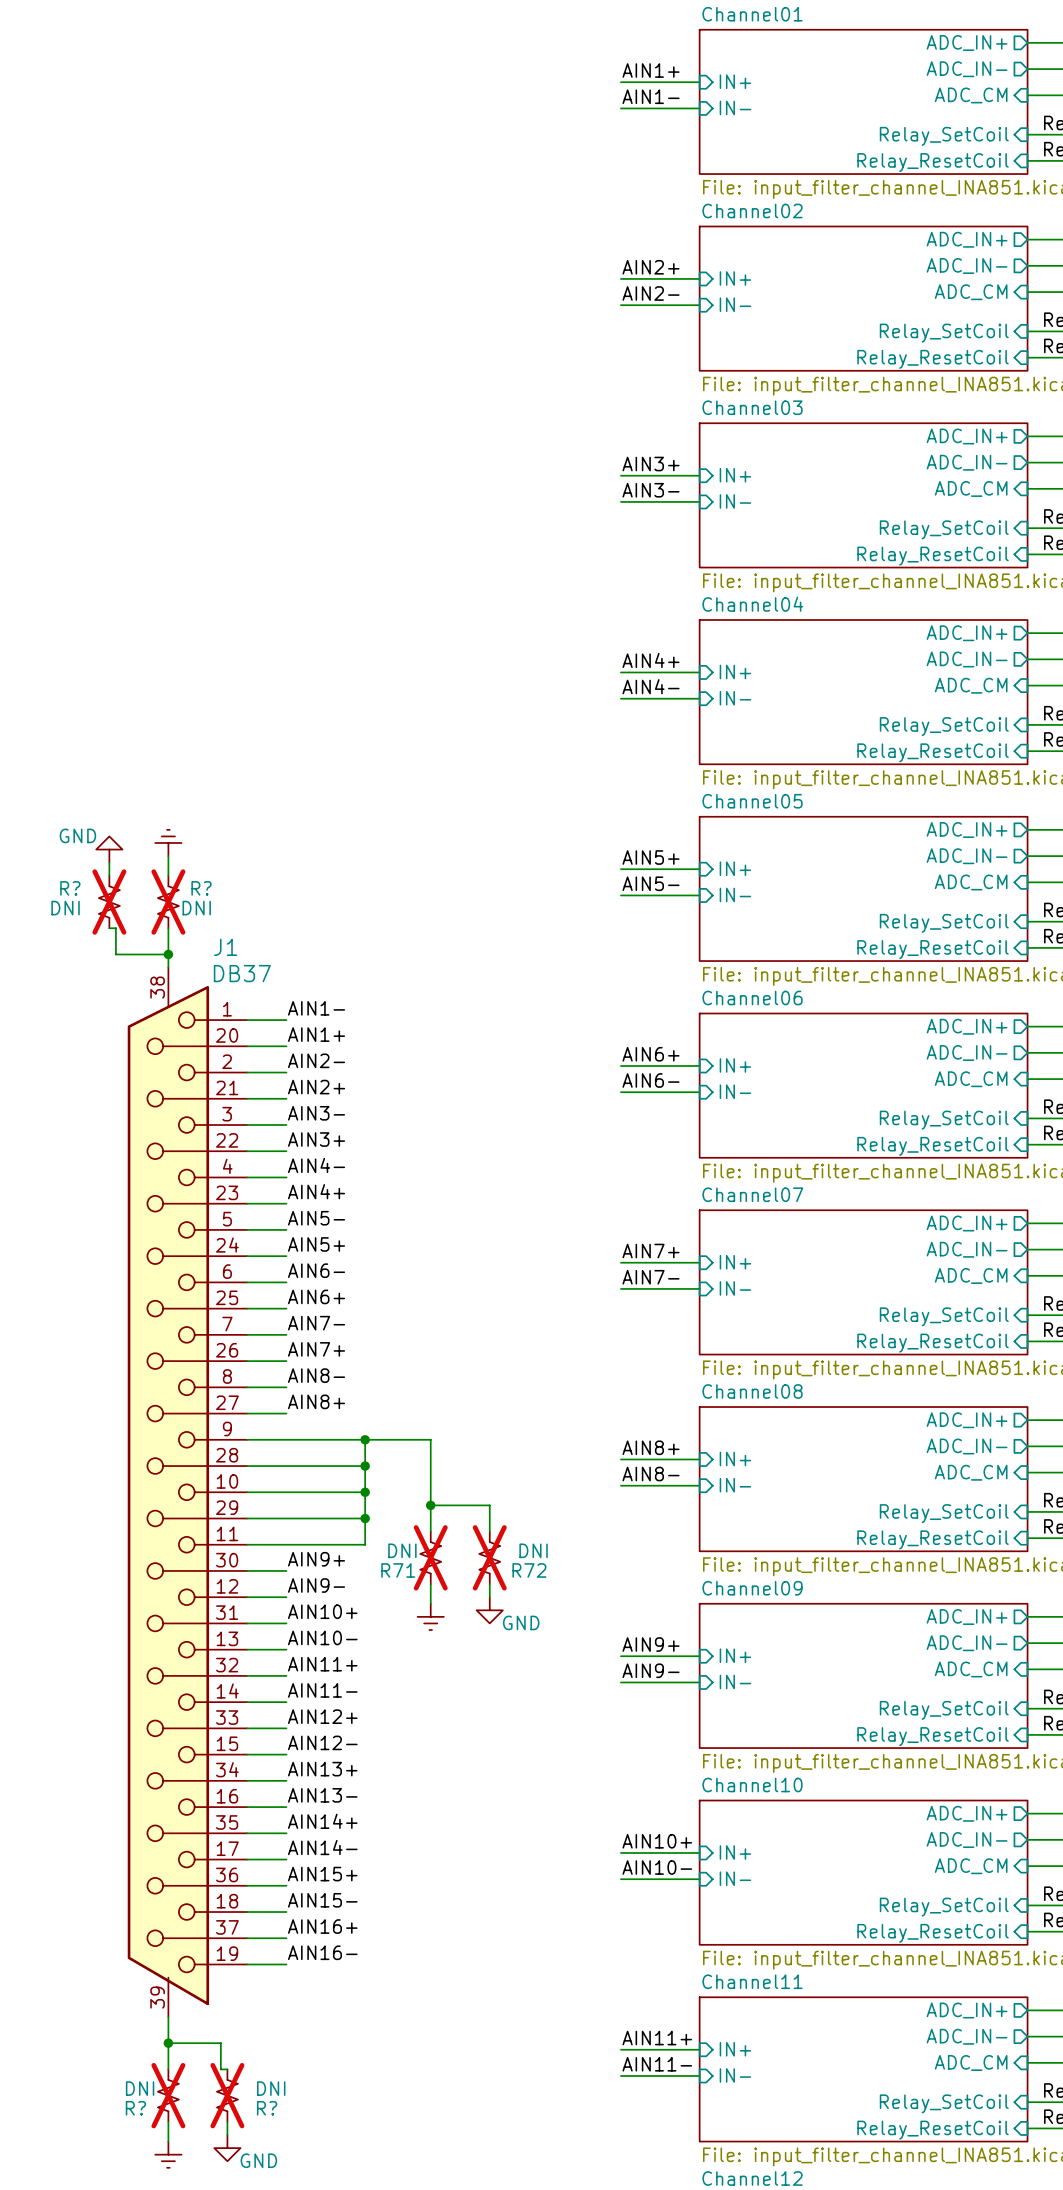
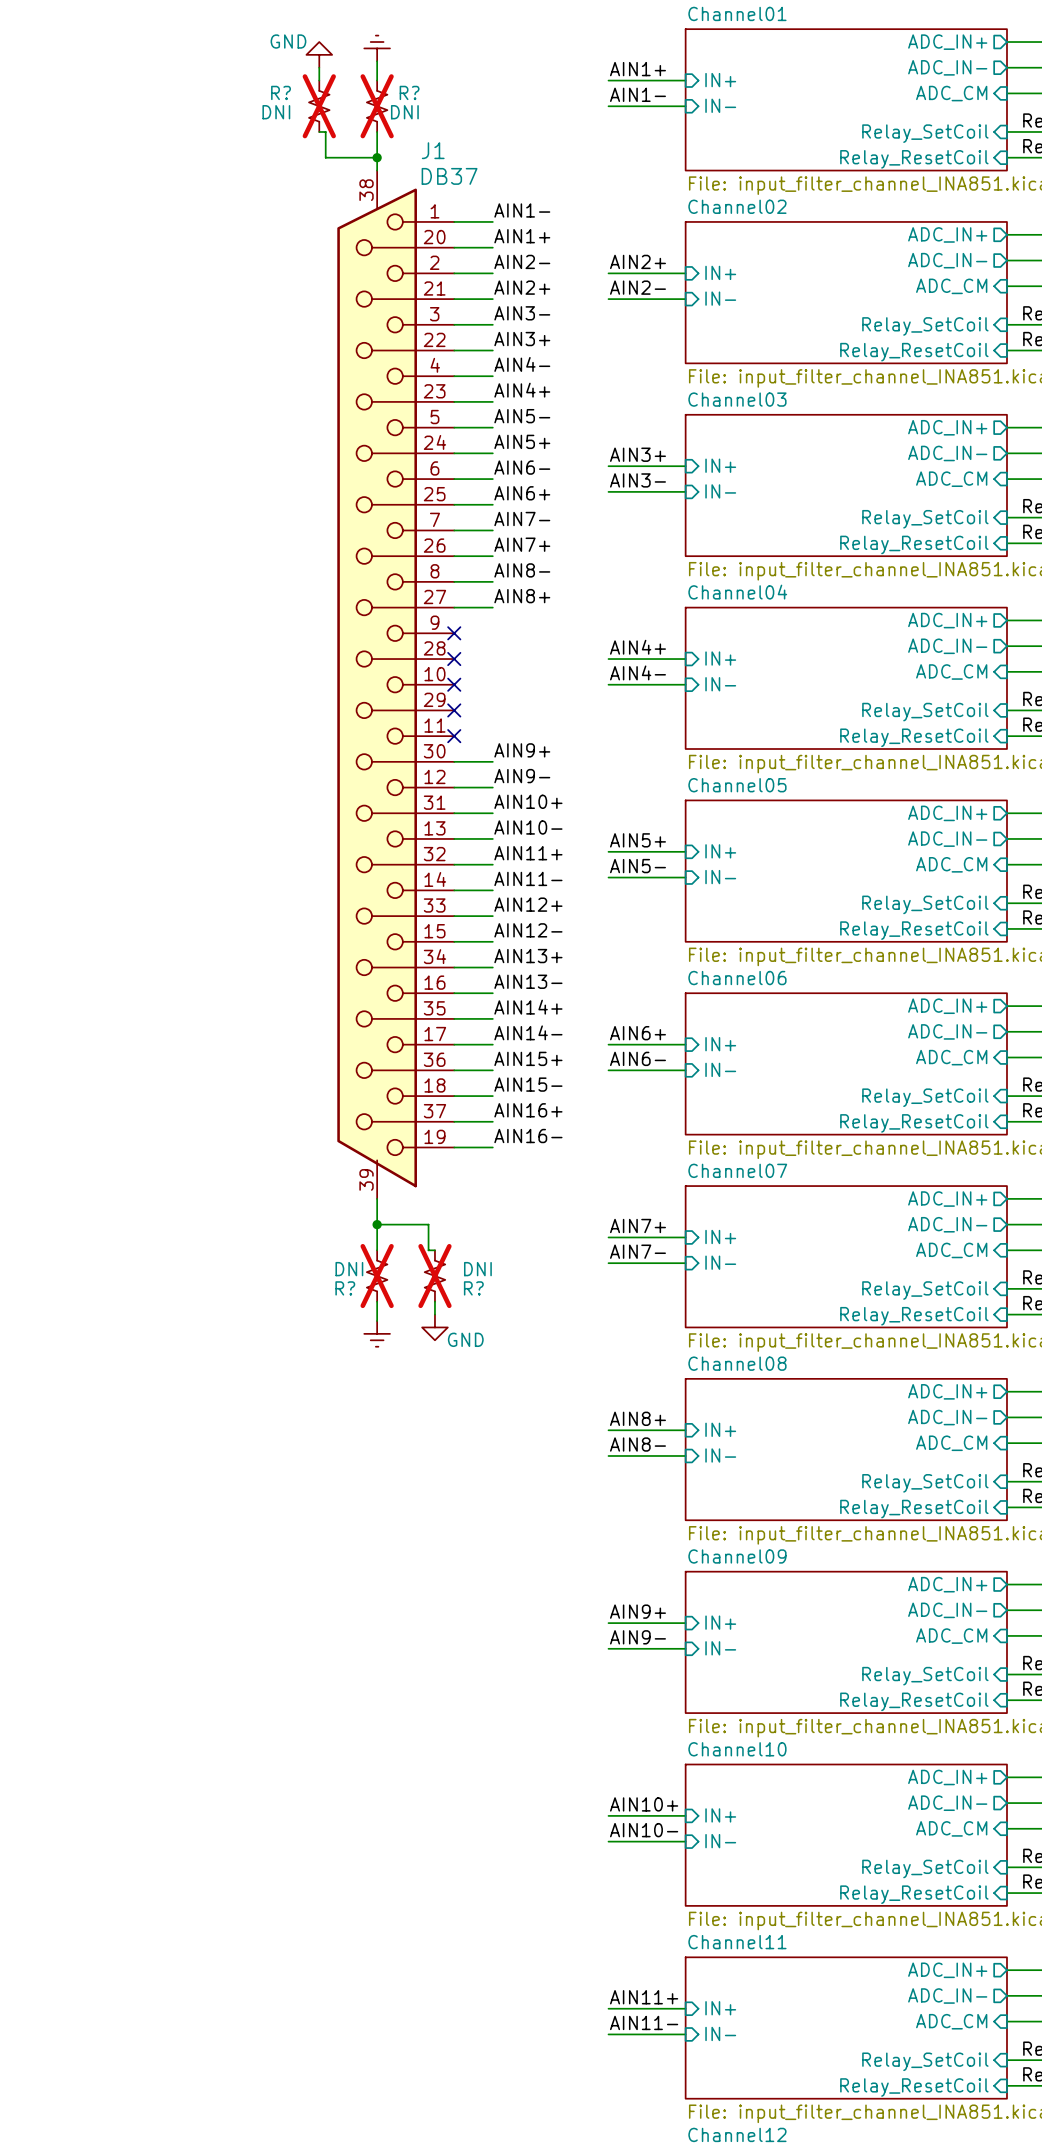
power symbol: none -> (377, 48)
power symbol: none -> GND (319, 54)
wire: none -> (377, 61) (377, 80)
wire: none -> (319, 67) (319, 80)
R?: none -> DNI (319, 106)
R?: none -> DNI (377, 106)
wire: none -> (319, 131) (325, 131) (325, 157) (377, 157)
wire: none -> (377, 131) (377, 170)
junction: none -> (377, 157)
label: none -> AIN1- (522, 210)
wire: none -> (454, 221) (492, 221)
label: none -> AIN1+ (522, 236)
wire: none -> (454, 247) (492, 247)
label: none -> AIN2- (522, 261)
wire: none -> (454, 273) (492, 273)
label: none -> AIN2+ (522, 287)
wire: none -> (454, 299) (492, 299)
label: none -> AIN3- (522, 313)
wire: none -> (454, 324) (492, 324)
label: none -> AIN3+ (522, 339)
wire: none -> (454, 350) (492, 350)
label: none -> AIN4- (522, 364)
wire: none -> (454, 376) (492, 376)
label: none -> AIN4+ (522, 390)
wire: none -> (454, 401) (492, 401)
label: none -> AIN5- (522, 416)
wire: none -> (454, 427) (492, 427)
label: none -> AIN5+ (522, 441)
wire: none -> (454, 453) (492, 453)
label: none -> AIN6- (522, 467)
wire: none -> (454, 479) (492, 479)
label: none -> AIN6+ (522, 493)
wire: none -> (454, 504) (492, 504)
label: none -> AIN7- (522, 519)
wire: none -> (454, 530) (492, 530)
label: none -> AIN7+ (522, 544)
wire: none -> (454, 556) (492, 556)
label: none -> AIN8- (522, 570)
wire: none -> (454, 581) (492, 581)
label: none -> AIN8+ (522, 596)
wire: none -> (454, 607) (492, 607)
no-connect mark: none -> (454, 633)
no-connect mark: none -> (454, 659)
no-connect mark: none -> (454, 684)
no-connect mark: none -> (454, 710)
no-connect mark: none -> (454, 736)
label: none -> AIN9+ (522, 750)
wire: none -> (454, 761) (492, 761)
label: none -> AIN9- (522, 776)
wire: none -> (454, 787) (492, 787)
label: none -> AIN10+ (528, 801)
wire: none -> (454, 813) (492, 813)
power symbol: (168, 842) -> none
label: none -> AIN10- (528, 827)
power symbol: GND (109, 849) -> none
wire: (168, 856) (168, 875) -> none
wire: none -> (454, 838) (492, 838)
wire: (109, 862) (109, 875) -> none
label: none -> AIN11+ (528, 853)
label: none -> AIN11- (528, 878)
R?: DNI (109, 902) -> none
R?: DNI (168, 902) -> none
label: none -> AIN12+ (528, 904)
wire: (109, 928) (115, 928) (115, 954) (168, 954) -> none
wire: (168, 928) (168, 967) -> none
label: none -> AIN12- (528, 930)
junction: (168, 954) -> none
label: none -> AIN13+ (528, 956)
label: none -> AIN13- (528, 981)
label: AIN1- (316, 1008) -> none
wire: (247, 1020) (286, 1020) -> (454, 864) (492, 864)
label: none -> AIN14+ (528, 1007)
label: AIN1+ (316, 1034) -> none
wire: (247, 1046) (286, 1046) -> (454, 890) (492, 890)
label: none -> AIN14- (528, 1032)
label: AIN2- (316, 1060) -> none
wire: (247, 1072) (286, 1072) -> (454, 916) (492, 916)
label: none -> AIN15+ (528, 1058)
label: AIN2+ (316, 1087) -> none
wire: (247, 1098) (286, 1098) -> (454, 941) (492, 941)
label: none -> AIN15- (528, 1084)
label: AIN3- (316, 1113) -> none
wire: (247, 1125) (286, 1125) -> (454, 967) (492, 967)
label: none -> AIN16+ (528, 1110)
label: AIN3+ (316, 1139) -> none
wire: (247, 1151) (286, 1151) -> (454, 993) (492, 993)
label: none -> AIN16- (528, 1136)
label: AIN4- (316, 1165) -> none
wire: (247, 1177) (286, 1177) -> (454, 1018) (492, 1018)
label: AIN4+ (316, 1191) -> none
wire: (247, 1203) (286, 1203) -> (454, 1044) (492, 1044)
label: AIN5- (316, 1218) -> none
wire: none -> (377, 1198) (377, 1250)
wire: (247, 1229) (286, 1229) -> (454, 1070) (492, 1070)
label: AIN5+ (316, 1244) -> none
wire: none -> (377, 1224) (428, 1224) (428, 1250) (434, 1250)
junction: none -> (377, 1224)
wire: (247, 1256) (286, 1256) -> (454, 1096) (492, 1096)
label: AIN6- (316, 1270) -> none
wire: (247, 1282) (286, 1282) -> (454, 1121) (492, 1121)
label: AIN6+ (316, 1296) -> none
R?: none -> DNI (377, 1276)
R?: none -> DNI (434, 1276)
wire: (247, 1308) (286, 1308) -> (454, 1147) (492, 1147)
label: AIN7- (316, 1323) -> none
wire: none -> (377, 1301) (377, 1321)
wire: none -> (434, 1301) (434, 1314)
wire: (247, 1334) (286, 1334) -> none
label: AIN7+ (316, 1349) -> none
power symbol: none -> GND (434, 1327)
wire: (247, 1361) (286, 1361) -> none
power symbol: none -> (377, 1333)
label: AIN8- (316, 1375) -> none
wire: (247, 1387) (286, 1387) -> none
label: AIN8+ (316, 1401) -> none
wire: (247, 1413) (286, 1413) -> none
wire: (247, 1439) (430, 1439) (430, 1531) -> none
wire: (365, 1439) (365, 1544) (247, 1544) -> none
junction: (365, 1439) -> none
wire: (247, 1466) (365, 1466) -> none
junction: (365, 1466) -> none
J1 position: (187, 1492) -> (395, 684)
wire: (247, 1492) (365, 1492) -> none
junction: (365, 1492) -> none
wire: (430, 1505) (489, 1505) (489, 1531) -> none
junction: (430, 1505) -> none
wire: (247, 1518) (365, 1518) -> none
junction: (365, 1518) -> none
R71: DNI (430, 1557) -> none
R72: DNI (489, 1557) -> none
label: AIN9+ (316, 1559) -> none
wire: (247, 1570) (286, 1570) -> none
wire: (430, 1584) (430, 1603) -> none
wire: (489, 1584) (489, 1597) -> none
label: AIN9- (316, 1585) -> none
wire: (247, 1597) (286, 1597) -> none
power symbol: GND (489, 1610) -> none
label: AIN10+ (322, 1611) -> none
power symbol: (430, 1616) -> none
wire: (247, 1623) (286, 1623) -> none
label: AIN10- (322, 1637) -> none
wire: (247, 1649) (286, 1649) -> none
label: AIN11+ (322, 1664) -> none
wire: (247, 1675) (286, 1675) -> none
label: AIN11- (322, 1690) -> none
wire: (247, 1702) (286, 1702) -> none
label: AIN12+ (322, 1716) -> none
wire: (247, 1728) (286, 1728) -> none
label: AIN12- (322, 1742) -> none
wire: (247, 1754) (286, 1754) -> none
label: AIN13+ (322, 1769) -> none
wire: (247, 1780) (286, 1780) -> none
label: AIN13- (322, 1795) -> none
wire: (247, 1807) (286, 1807) -> none
label: AIN14+ (322, 1821) -> none
wire: (247, 1833) (286, 1833) -> none
label: AIN14- (322, 1847) -> none
wire: (247, 1859) (286, 1859) -> none
label: AIN15+ (322, 1874) -> none
wire: (247, 1885) (286, 1885) -> none
label: AIN15- (322, 1900) -> none
wire: (247, 1912) (286, 1912) -> none
label: AIN16+ (322, 1926) -> none
wire: (247, 1938) (286, 1938) -> none
label: AIN16- (322, 1952) -> none
wire: (247, 1964) (286, 1964) -> none
wire: (168, 2016) (168, 2069) -> none
wire: (168, 2043) (220, 2043) (220, 2069) (227, 2069) -> none
junction: (168, 2043) -> none
R?: DNI (168, 2095) -> none
R?: DNI (227, 2095) -> none
wire: (168, 2121) (168, 2141) -> none
wire: (227, 2121) (227, 2135) -> none
power symbol: GND (227, 2148) -> none
power symbol: (168, 2154) -> none

